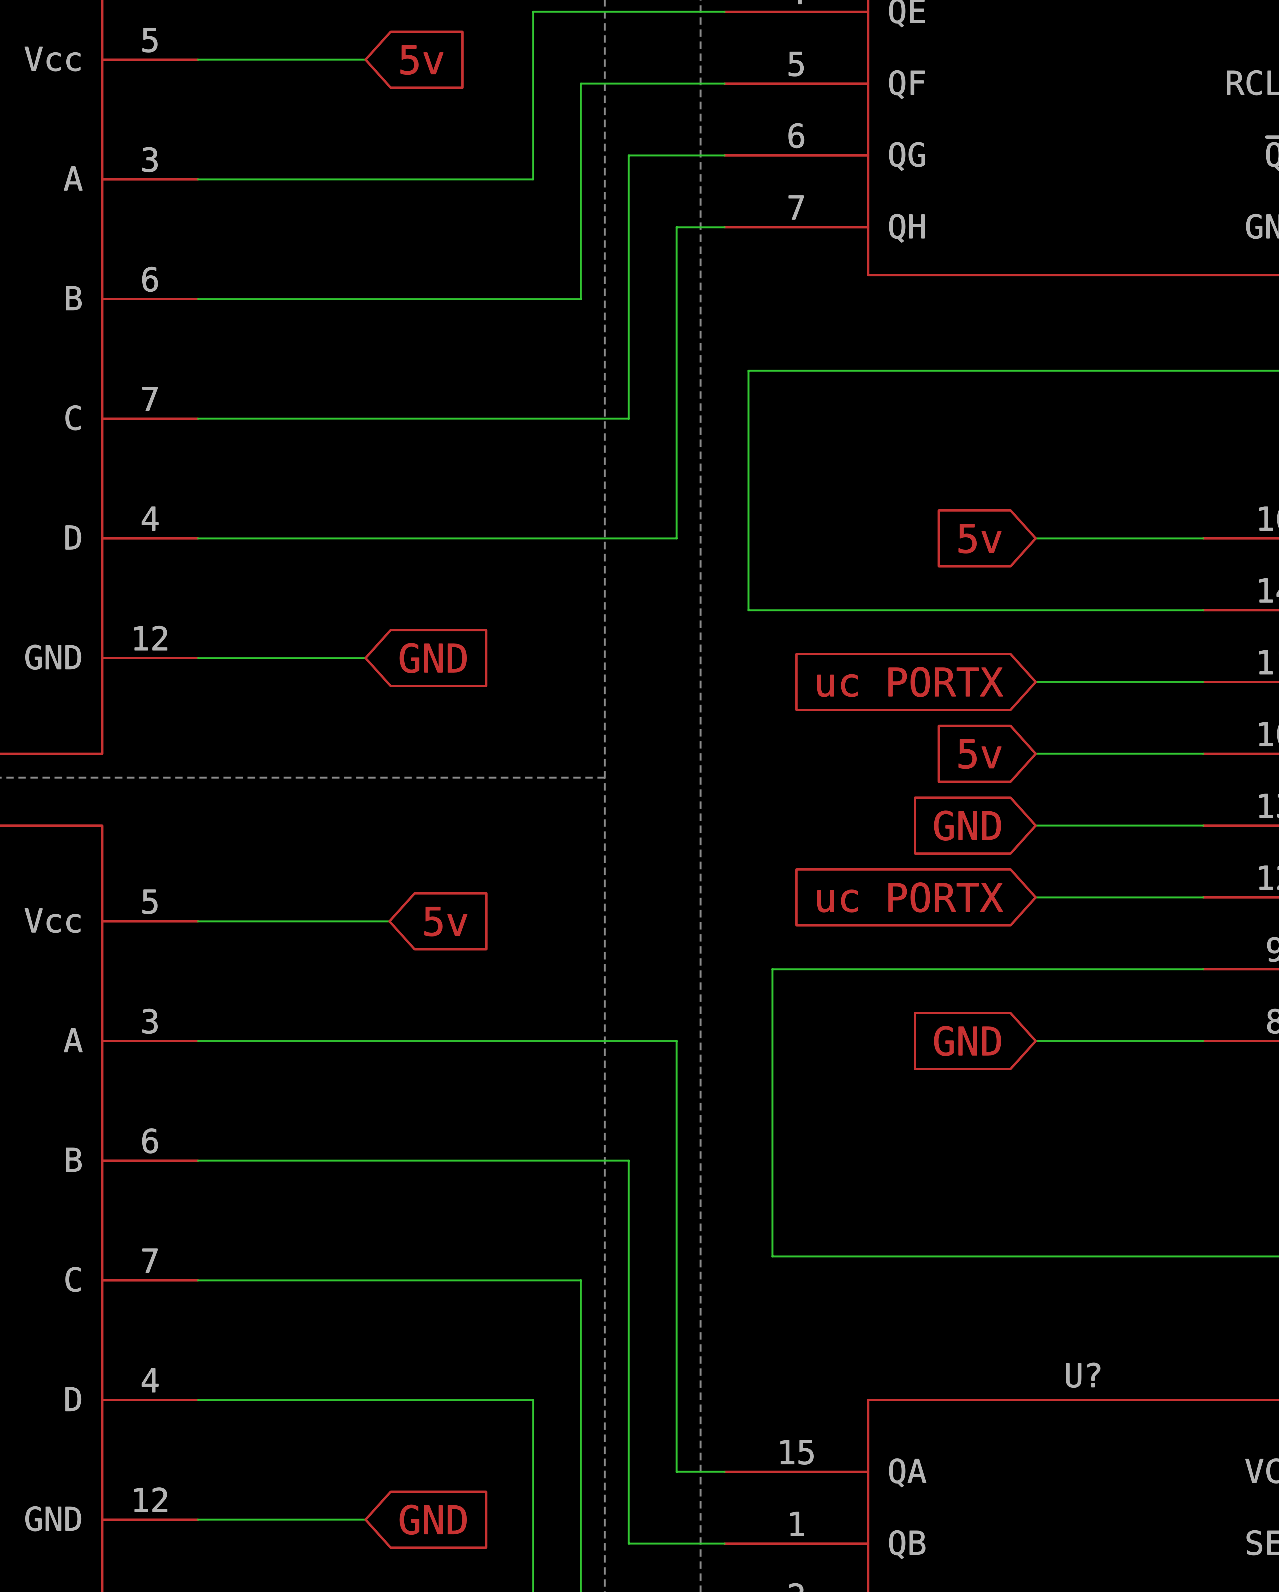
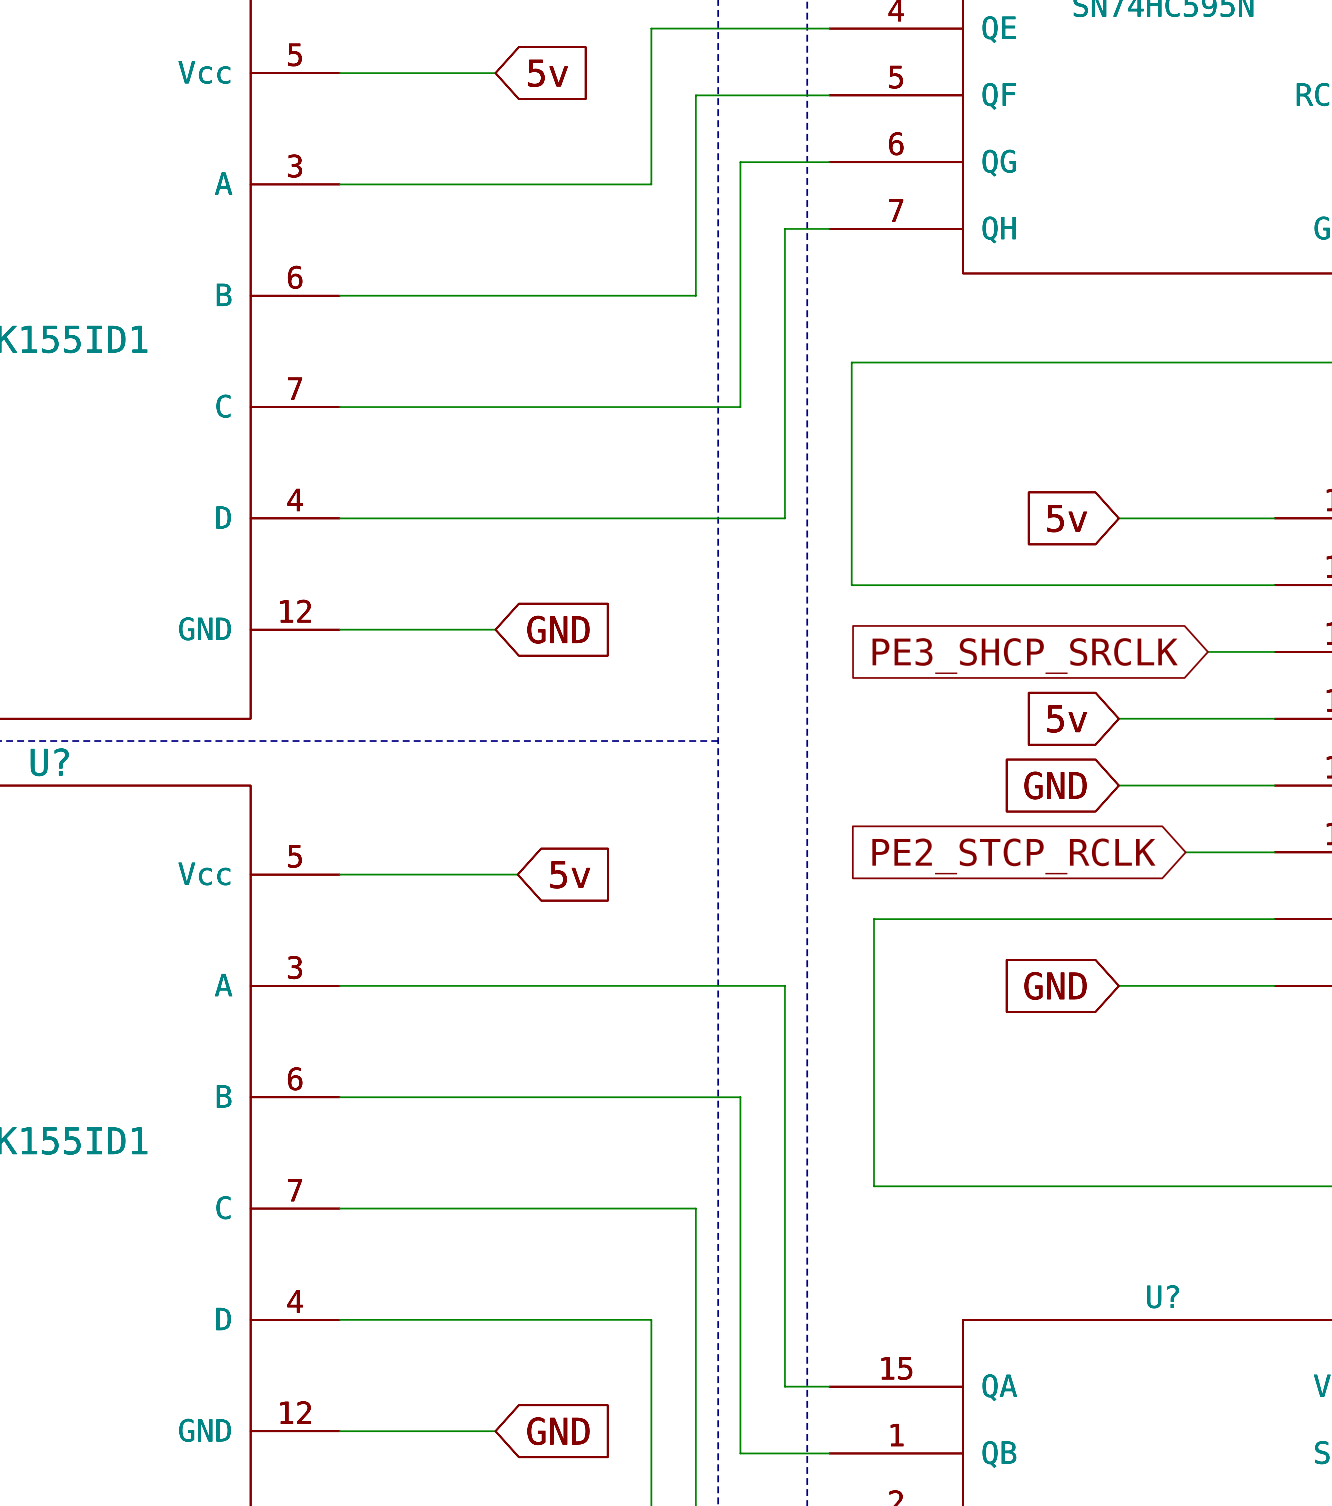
wire: (1035, 681) (1131, 681) -> none
global label: uc PORTX (910, 682) -> none
global label: none -> PE3_SHCP_SRCLK (1025, 656)
global label: uc PORTX (910, 897) -> none
wire: (1035, 897) (1107, 897) -> none
global label: none -> PE2_STCP_RCLK (1013, 856)

